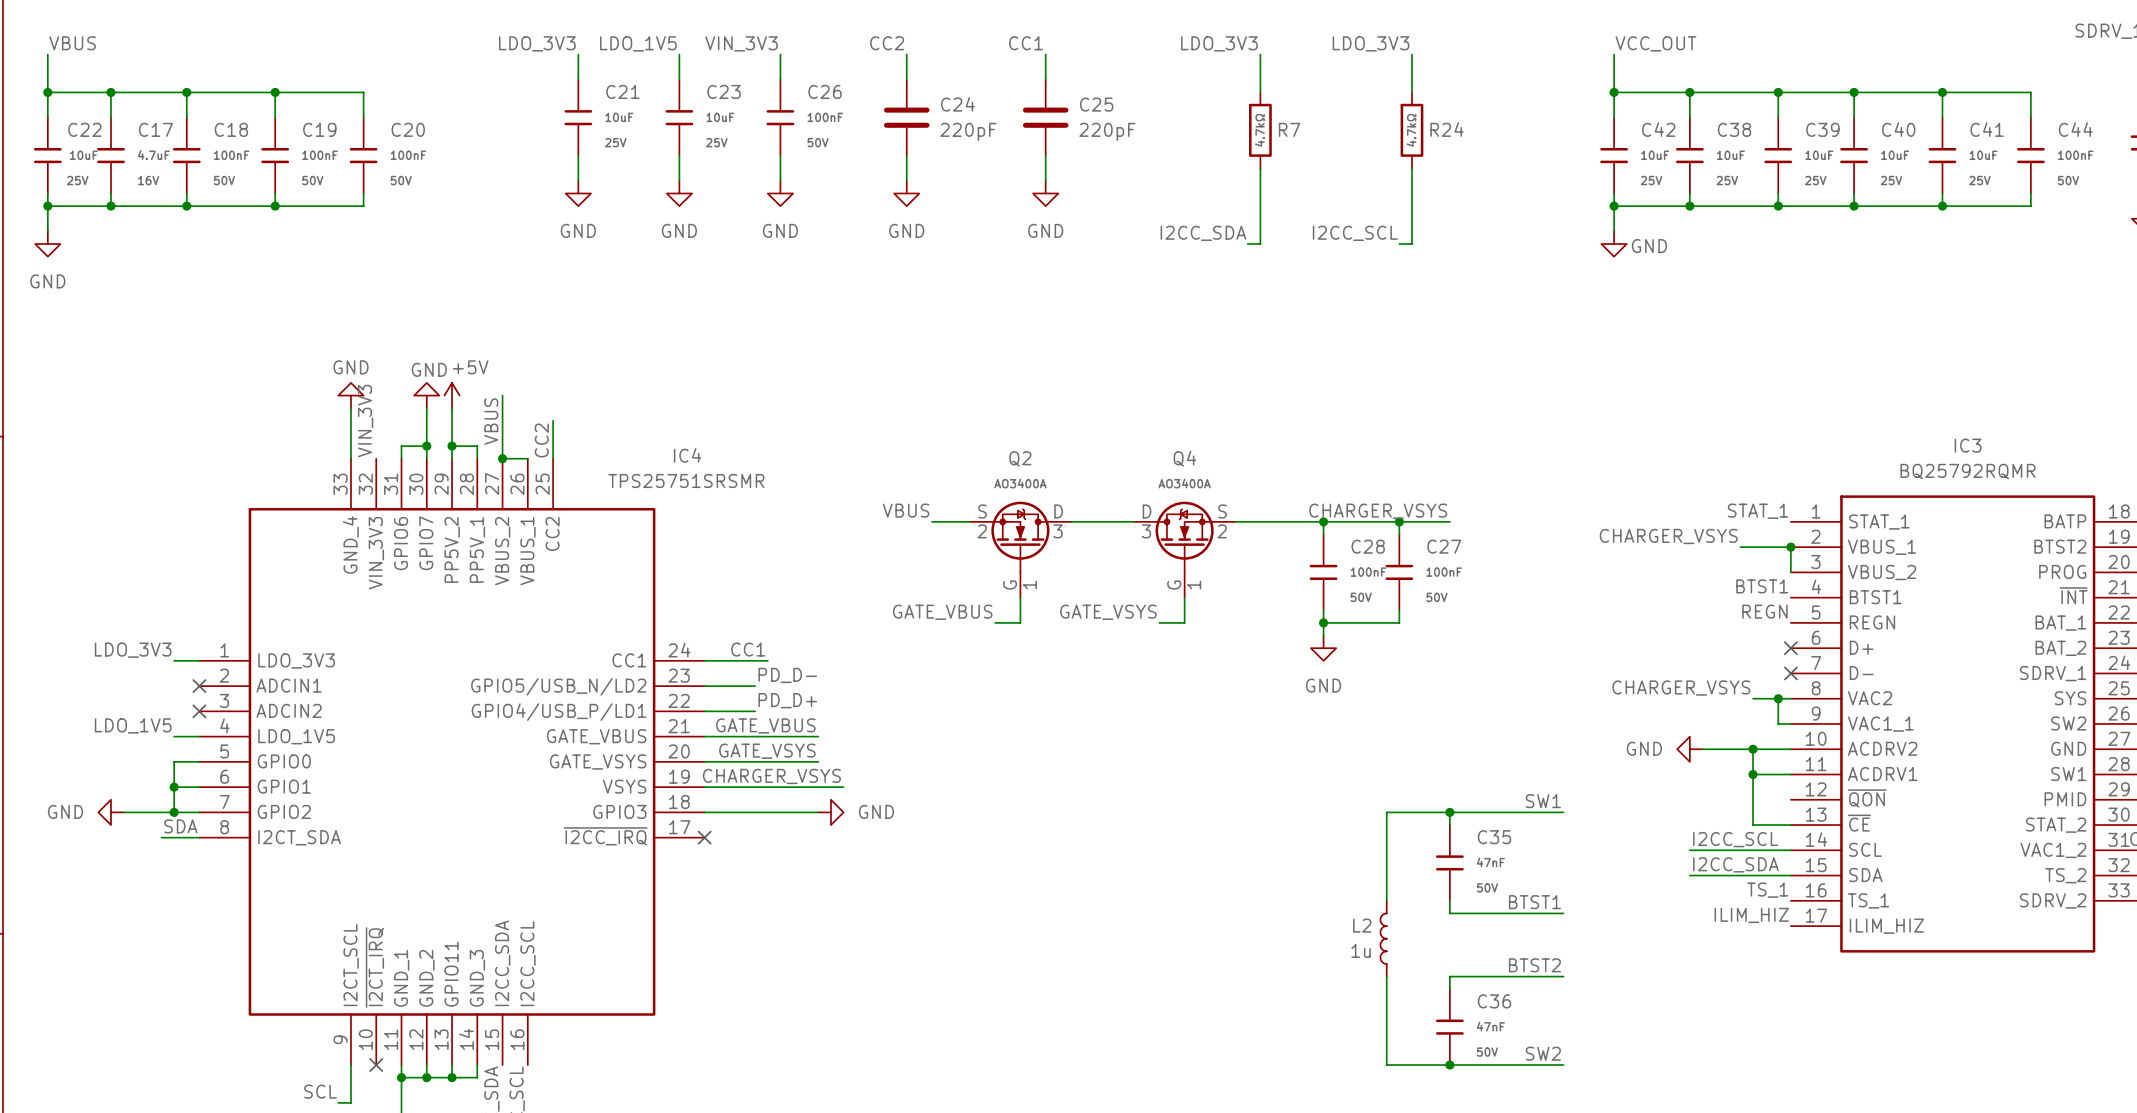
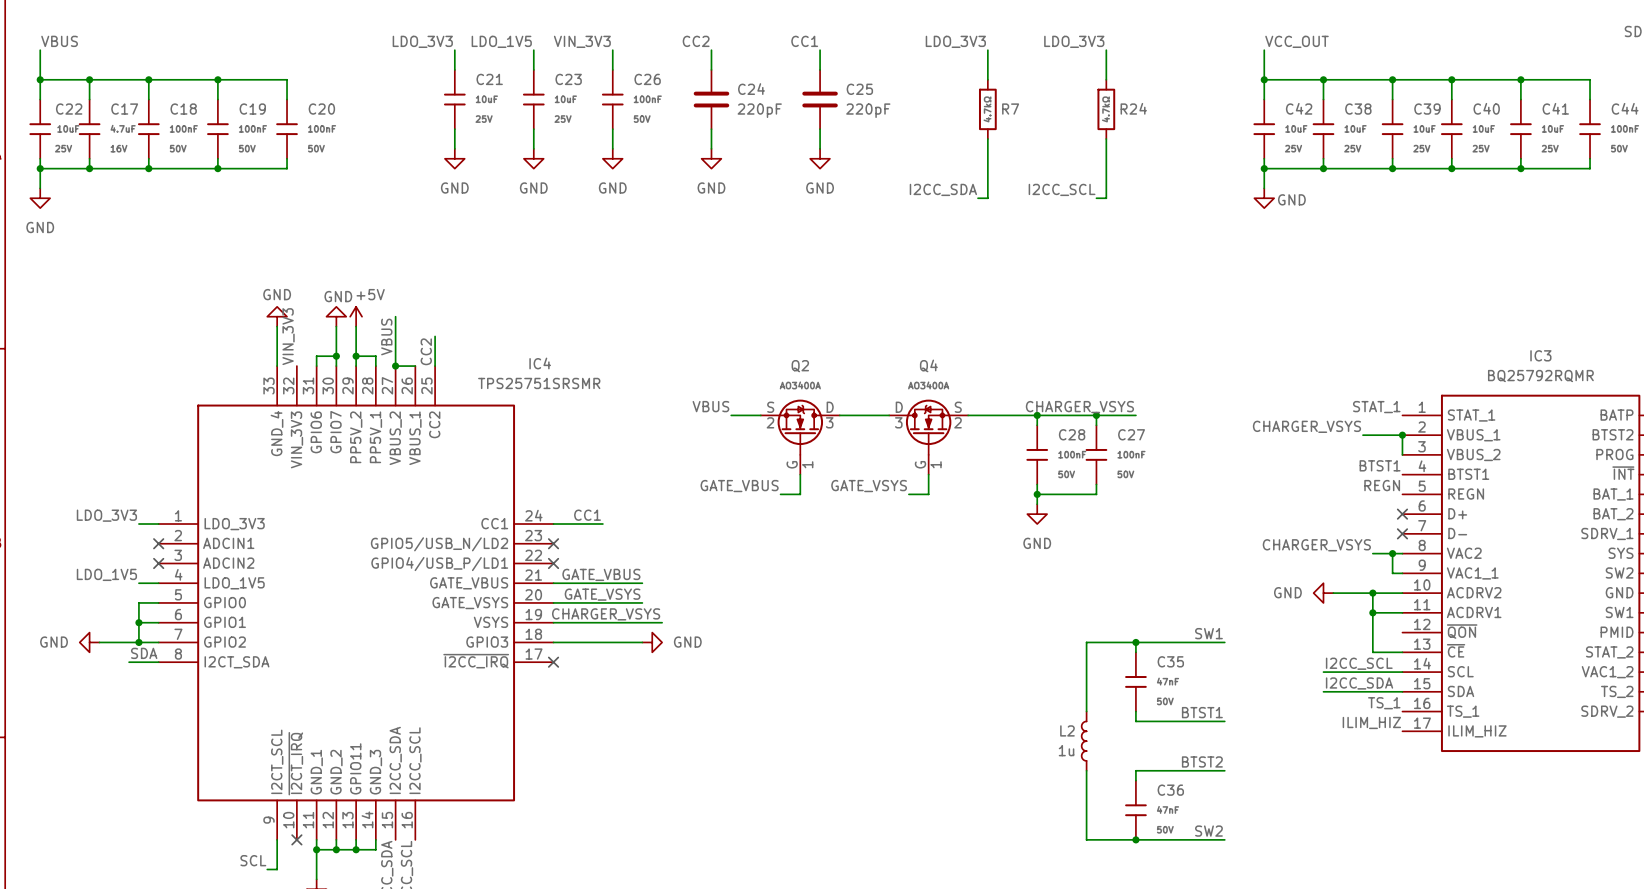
label: PD_D- (787, 675) -> none
wire: (704, 686) (755, 686) -> none
no-connect mark: none -> (553, 543)
label: PD_D+ (787, 700) -> none
wire: (704, 711) (755, 711) -> none
no-connect mark: none -> (553, 563)

